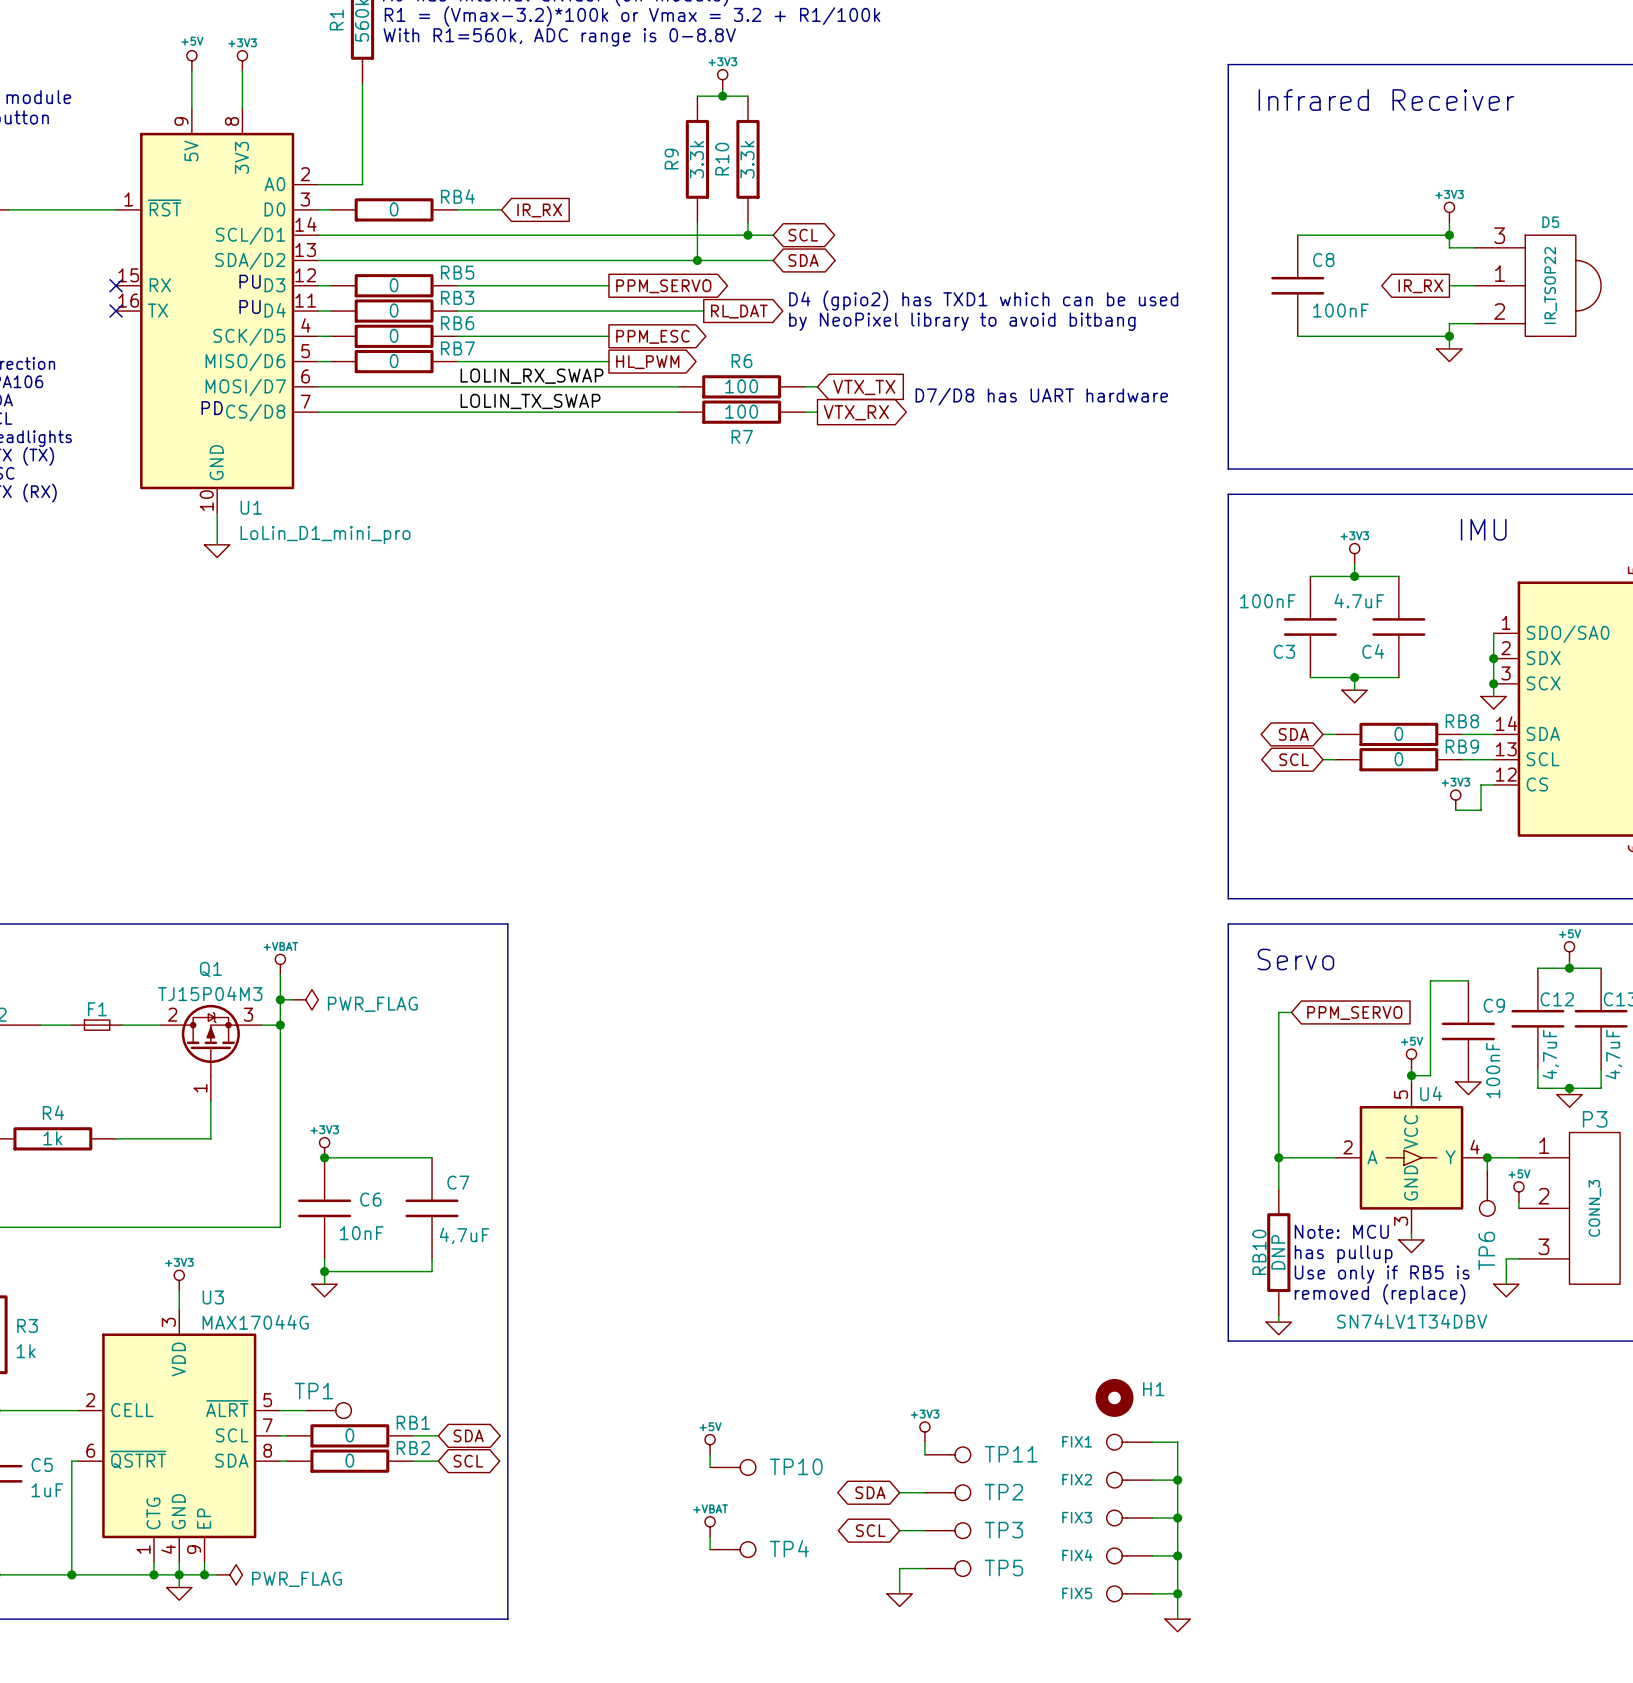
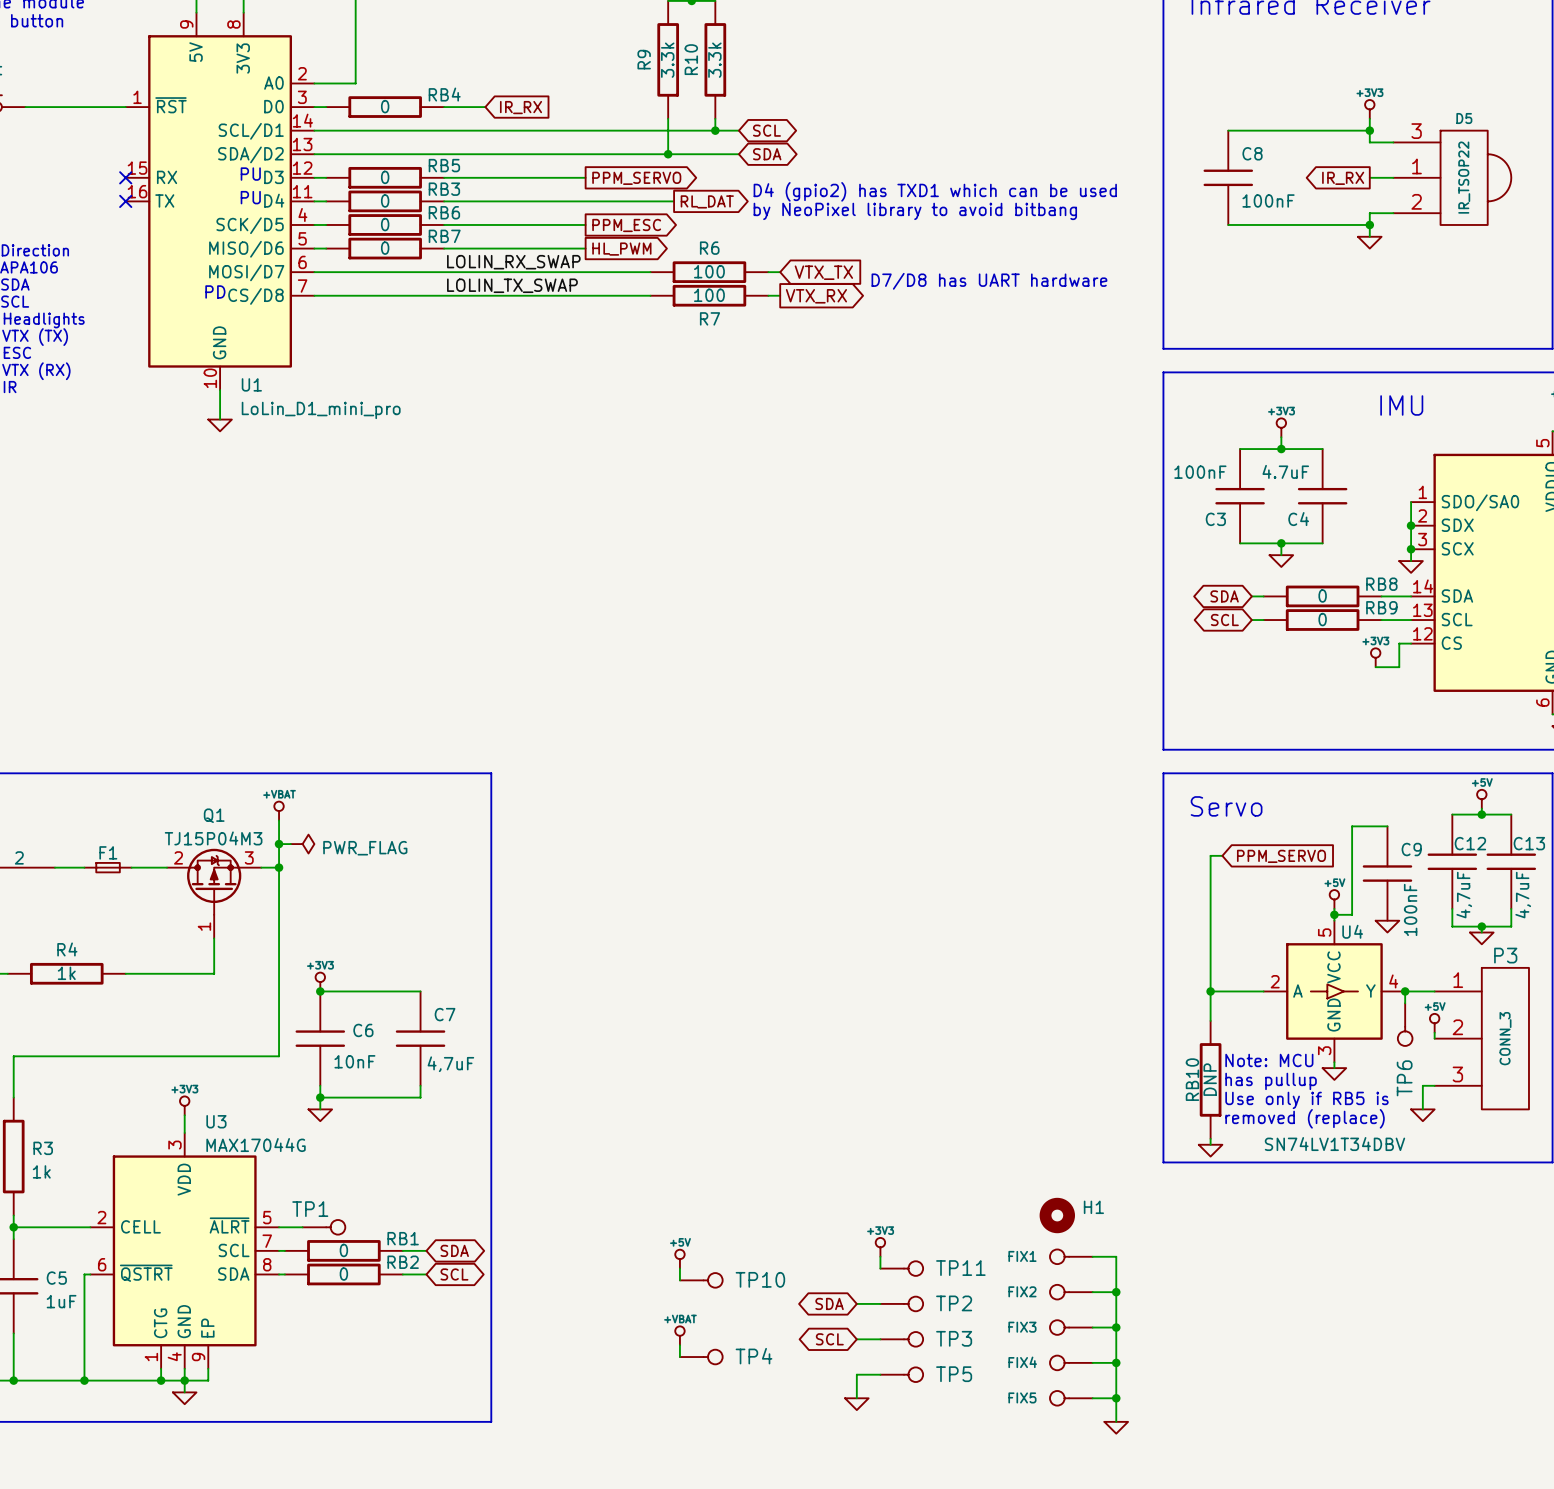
wire: (204, 1574) (217, 1574) -> none
junction: (204, 1574) -> none
power symbol: PWR_FLAG (229, 1574) -> none

